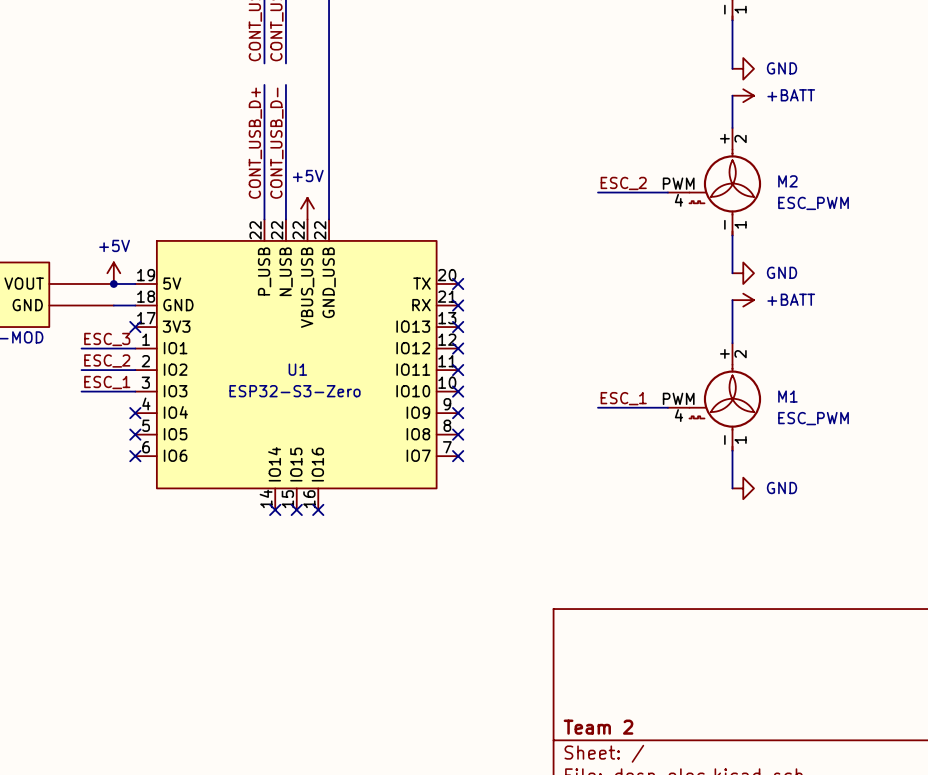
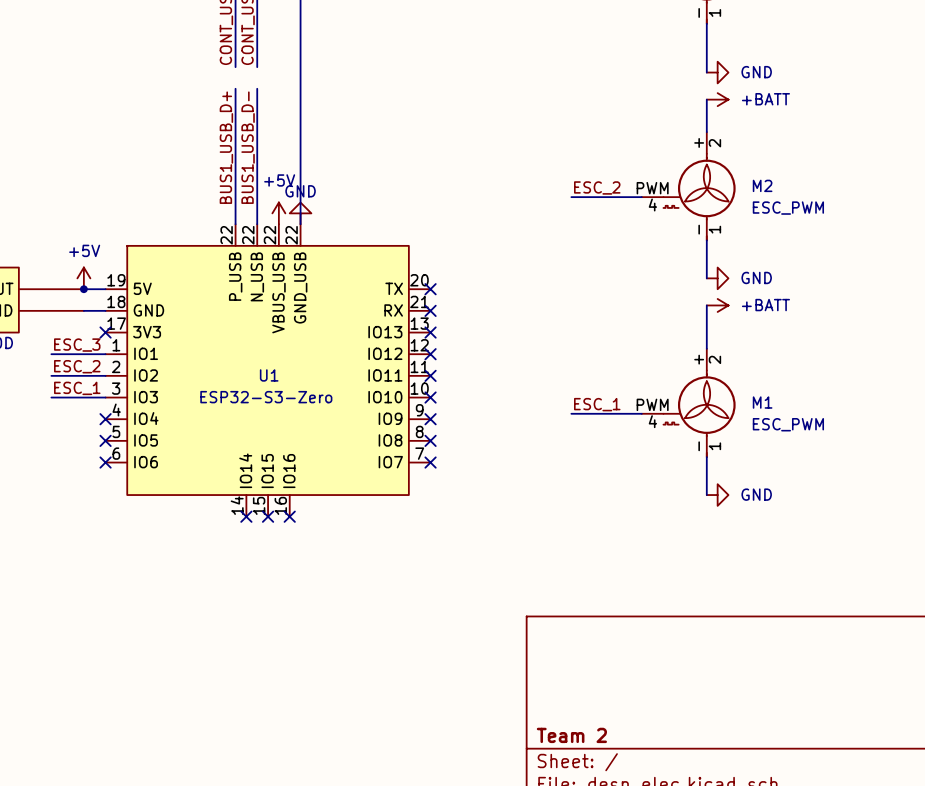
label: CONT_USB_D+ (255, 143) -> BUS1_USB_D+ (226, 147)
label: CONT_USB_D- (276, 143) -> BUS1_USB_D- (248, 147)
power symbol: none -> GND (300, 213)

